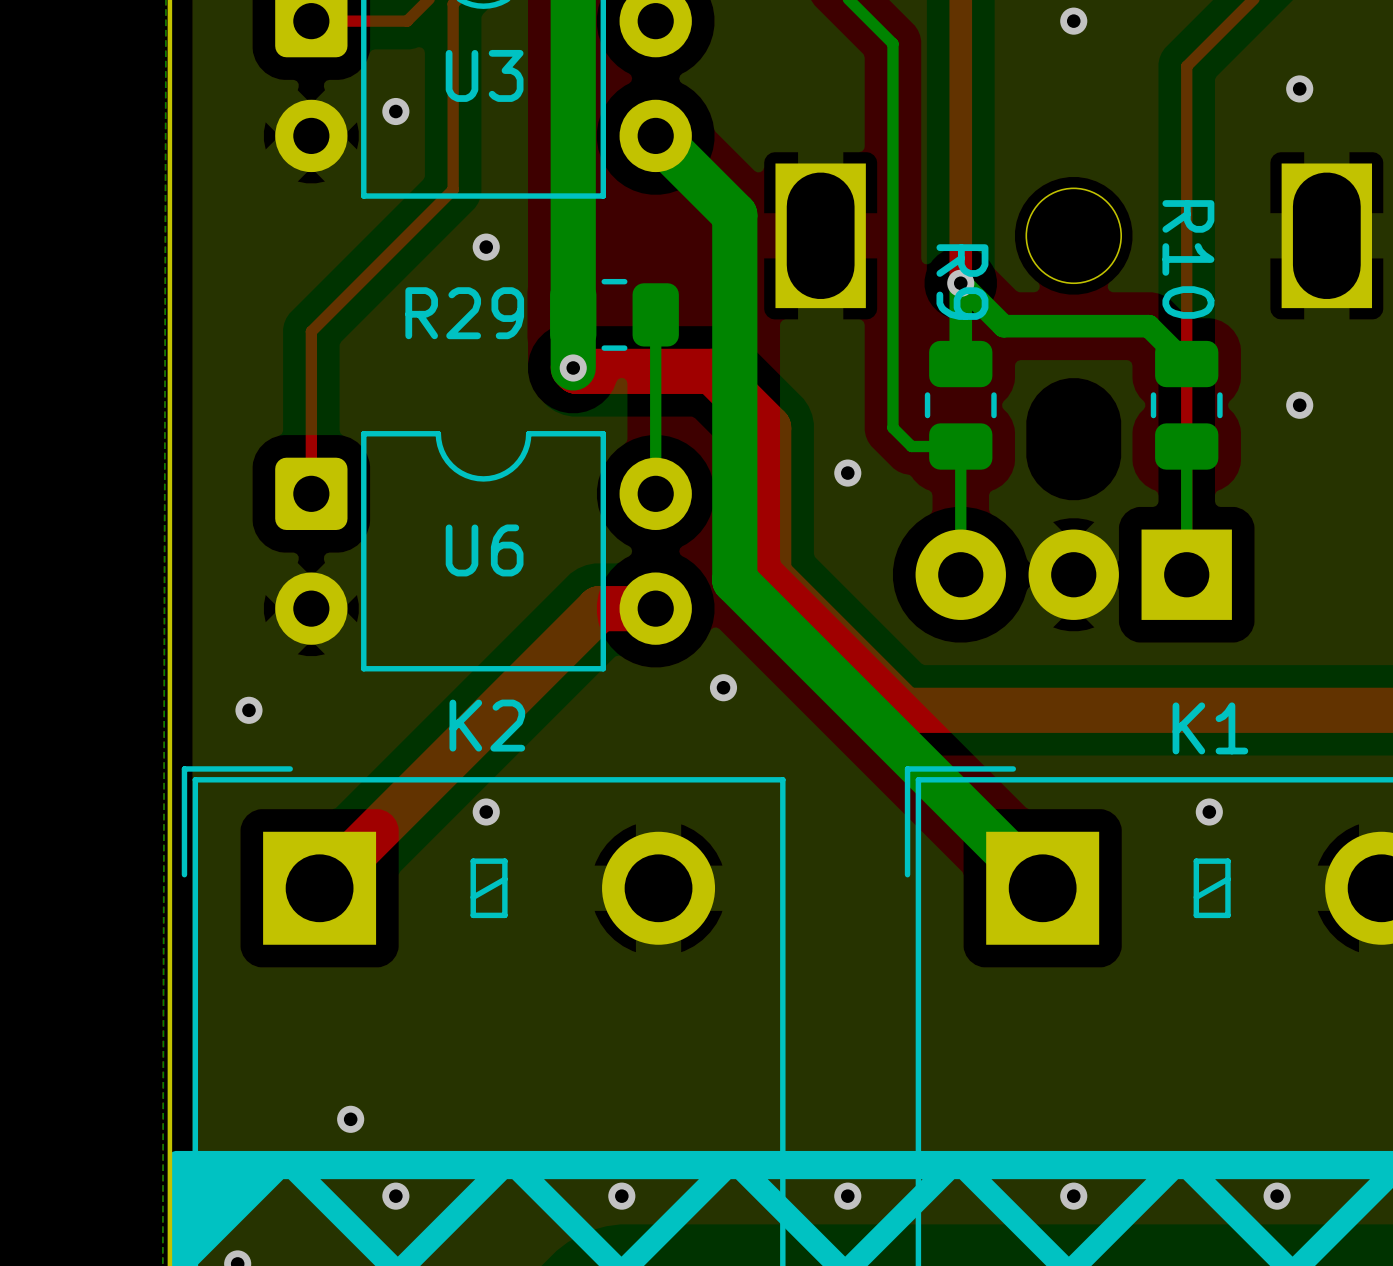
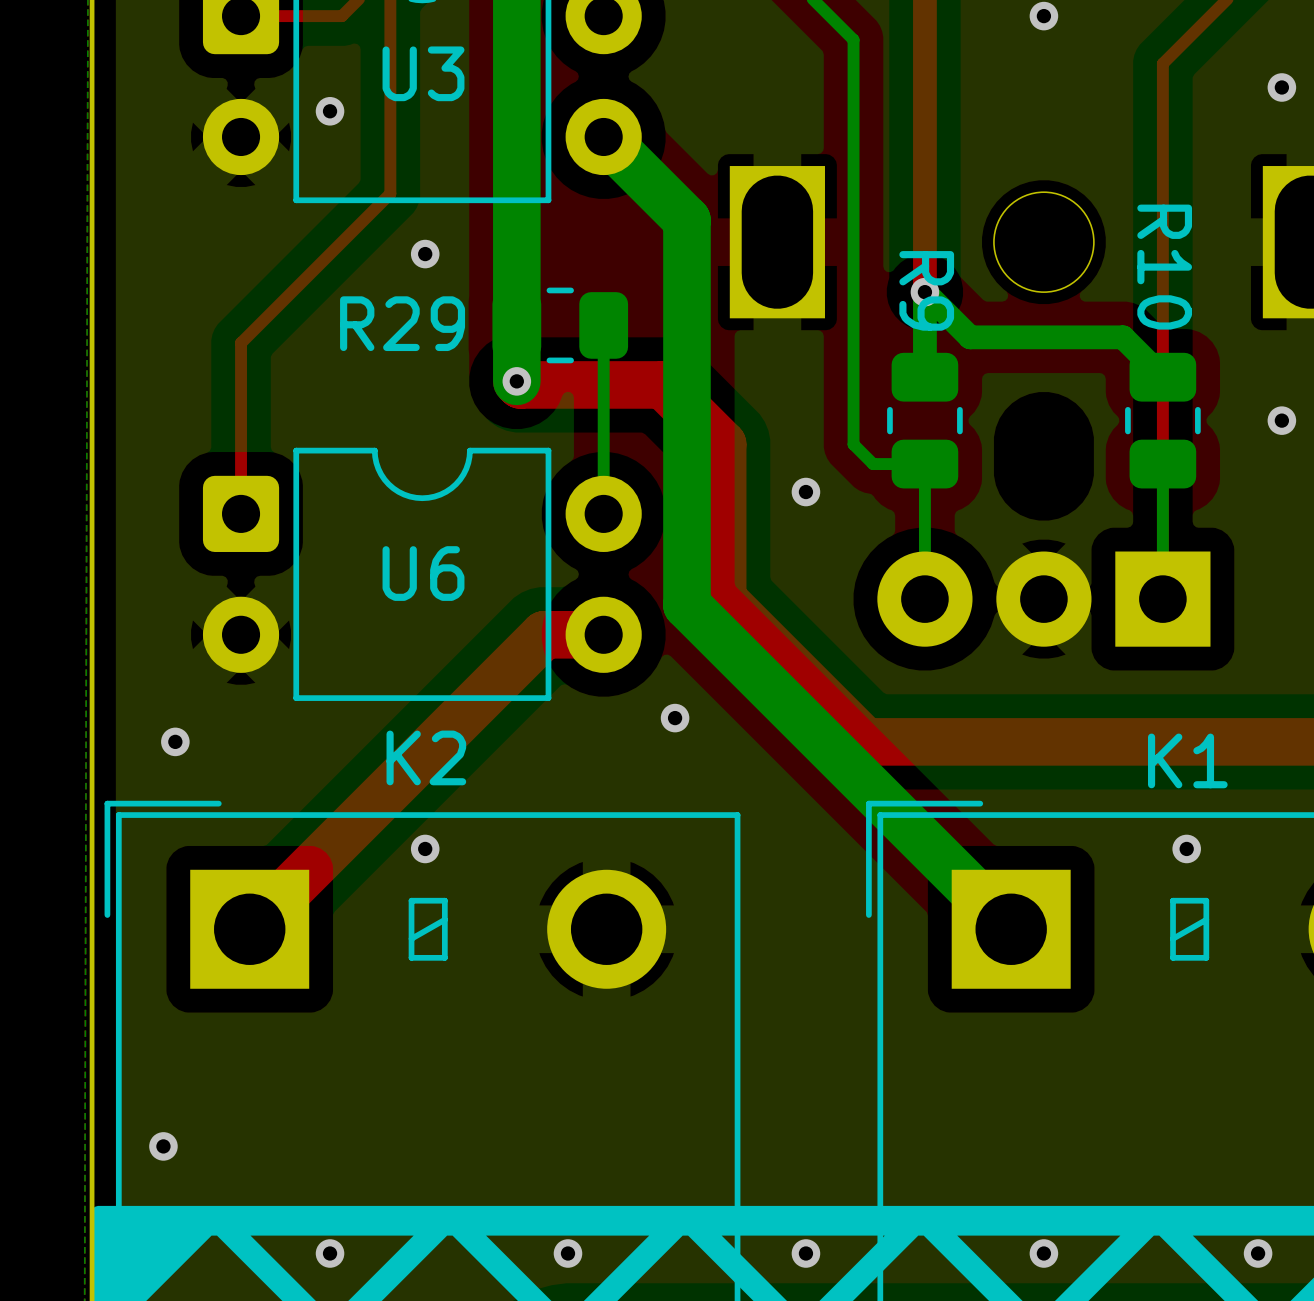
via position: (350, 1119) -> (163, 1146)

